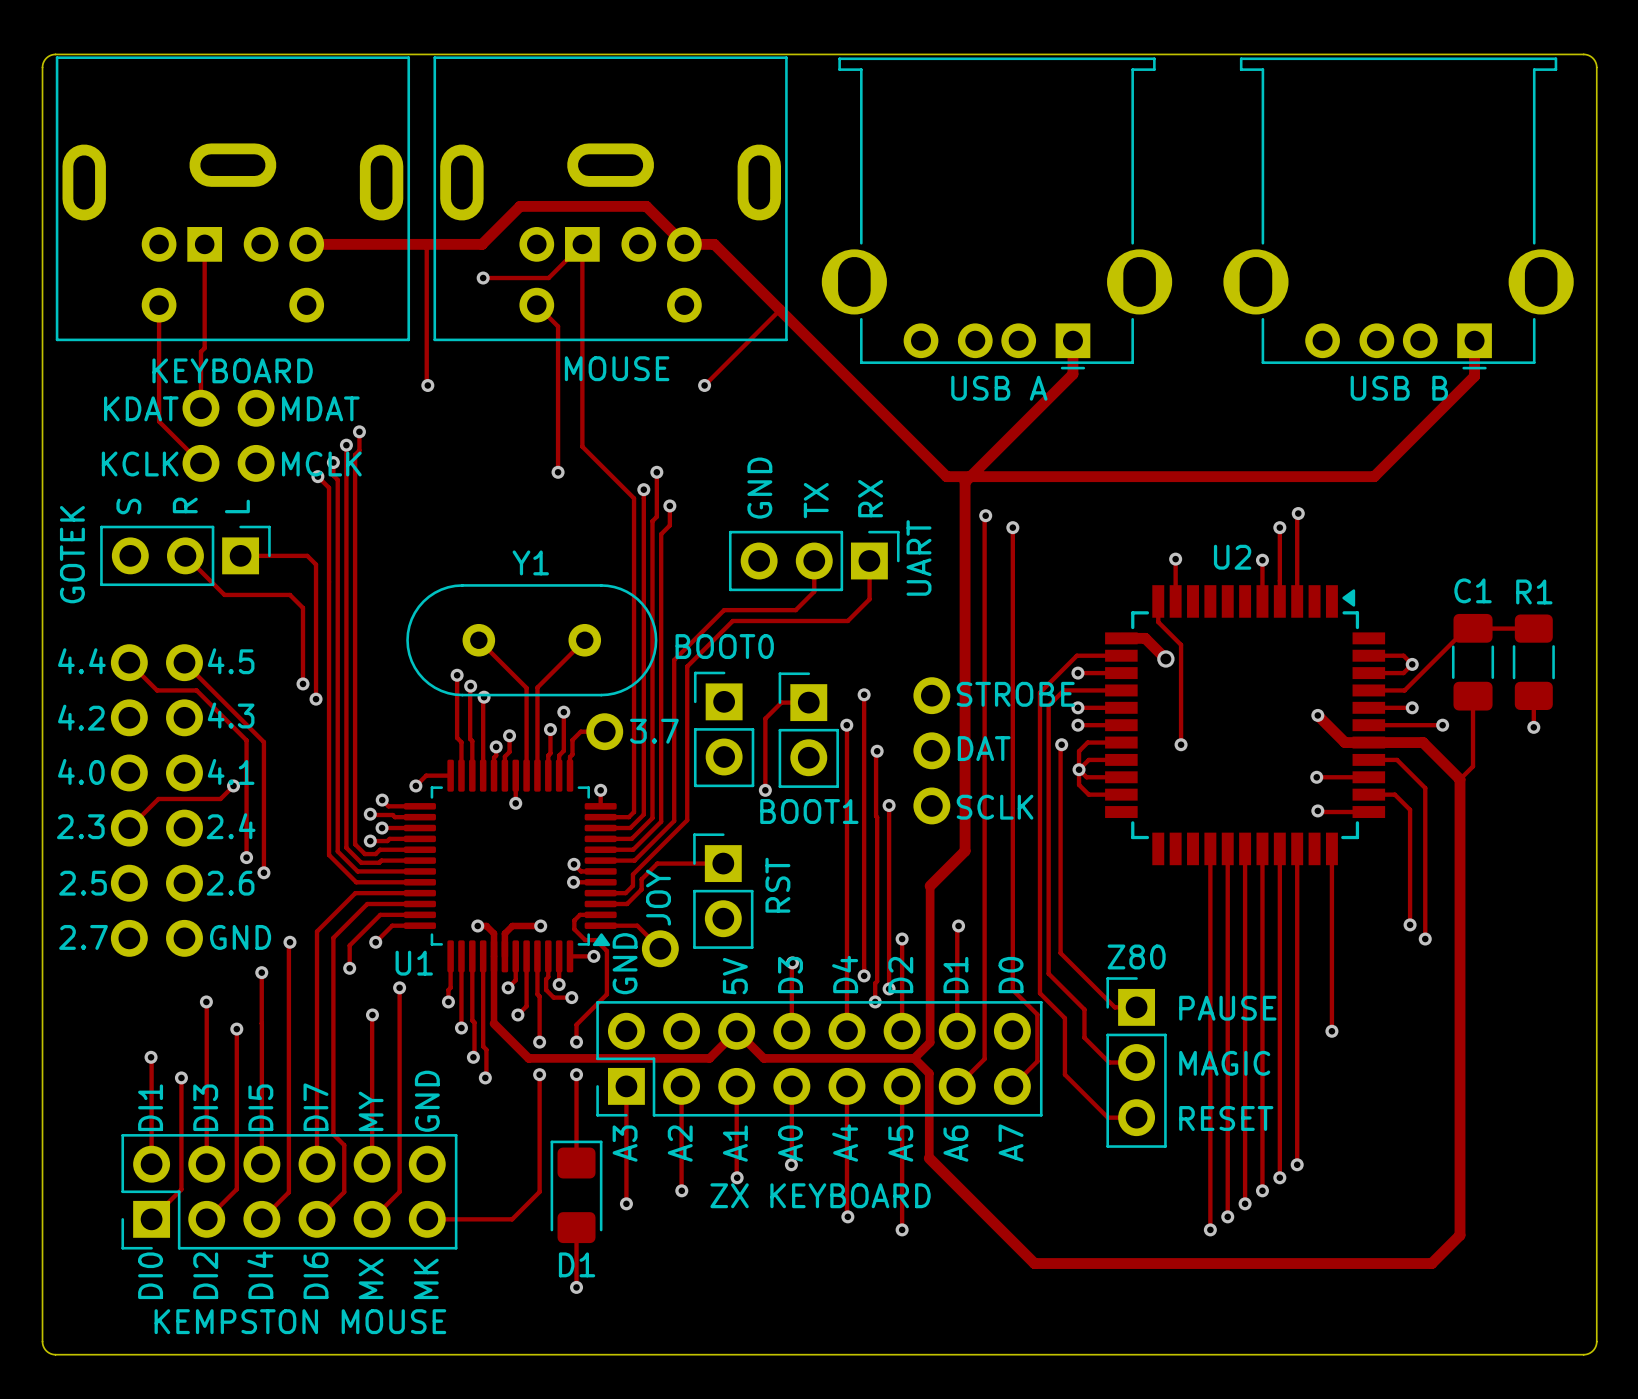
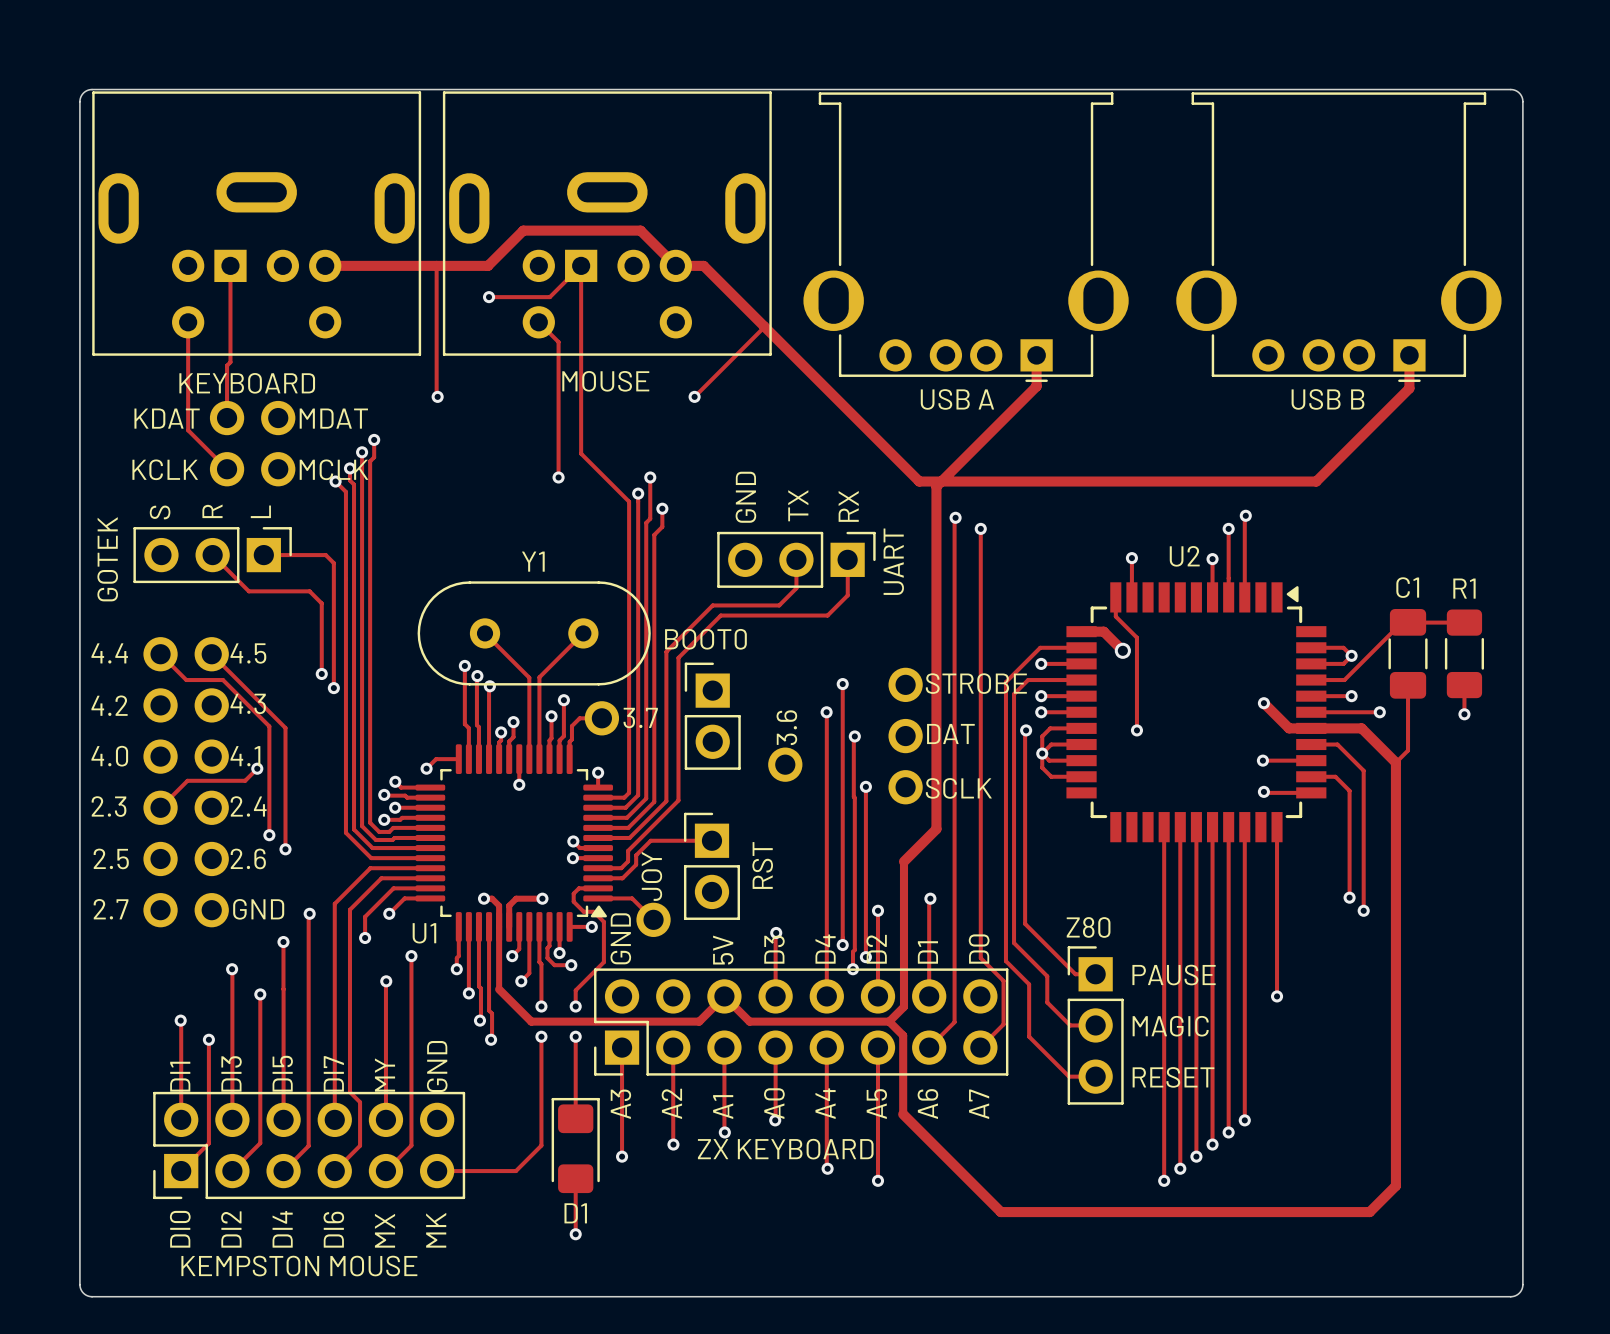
track: (808, 702) (781, 702) (765, 718) (765, 790) -> none
part: (808, 730) -> none
text: none -> 3.6 (786, 727)
part: none -> (785, 764)
via: (765, 790) -> none
text: BOOT1 (809, 811) -> none

